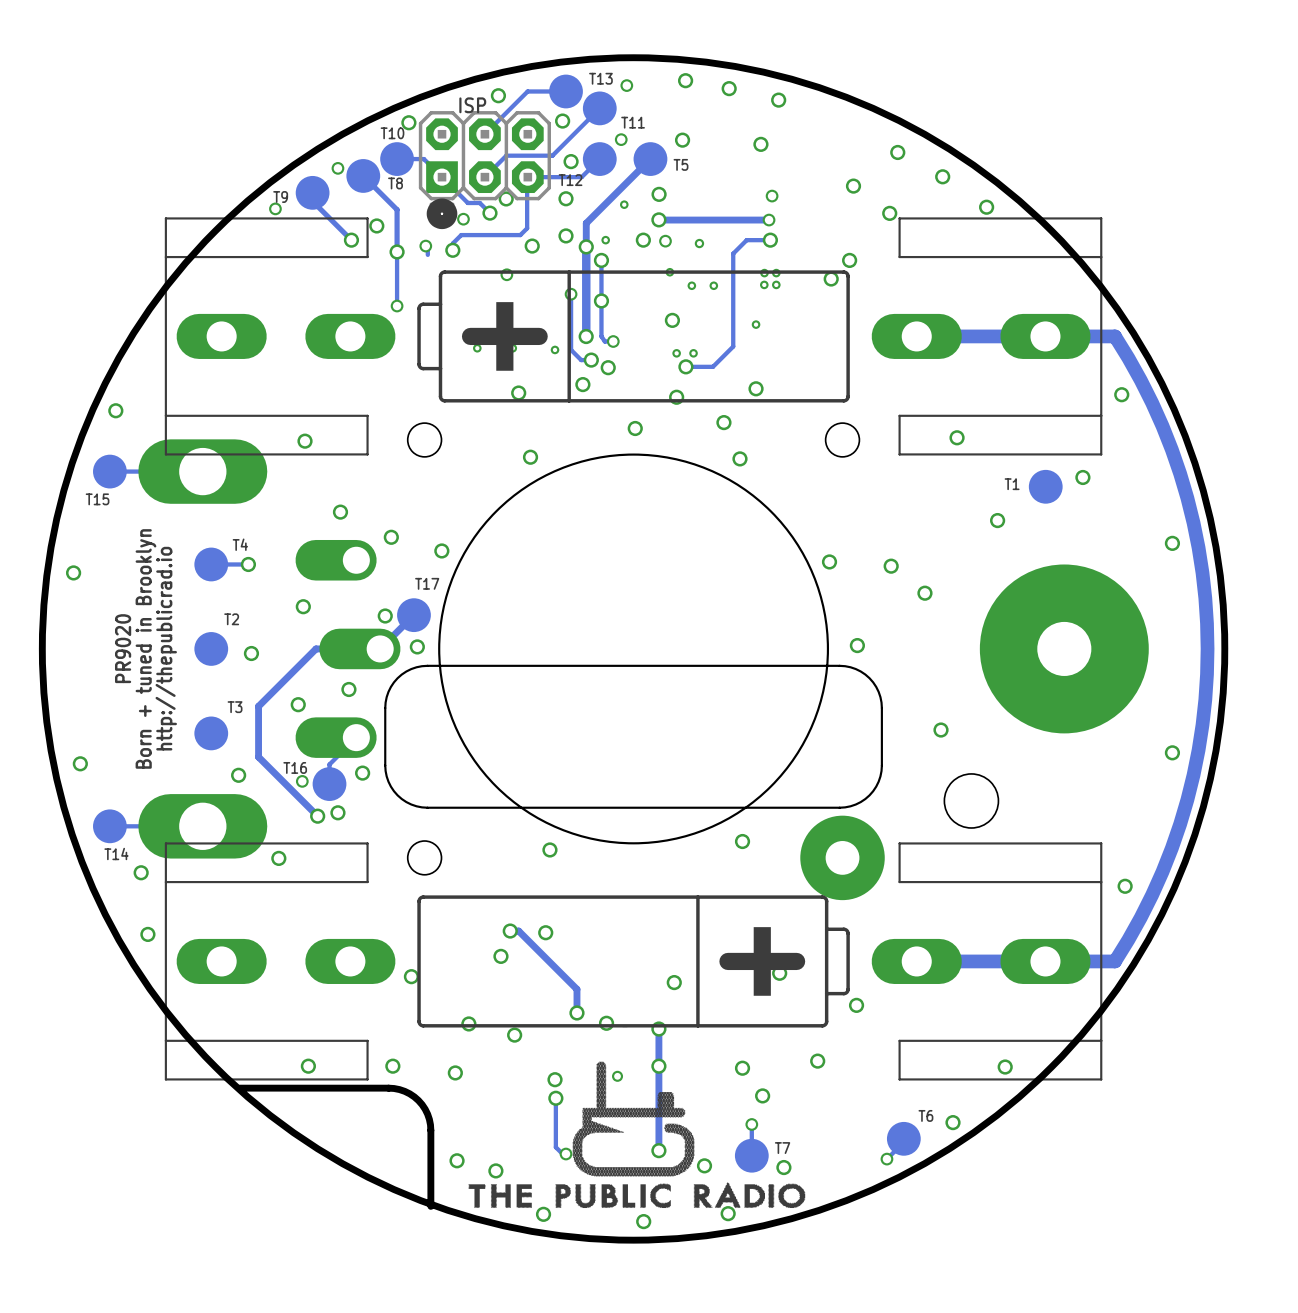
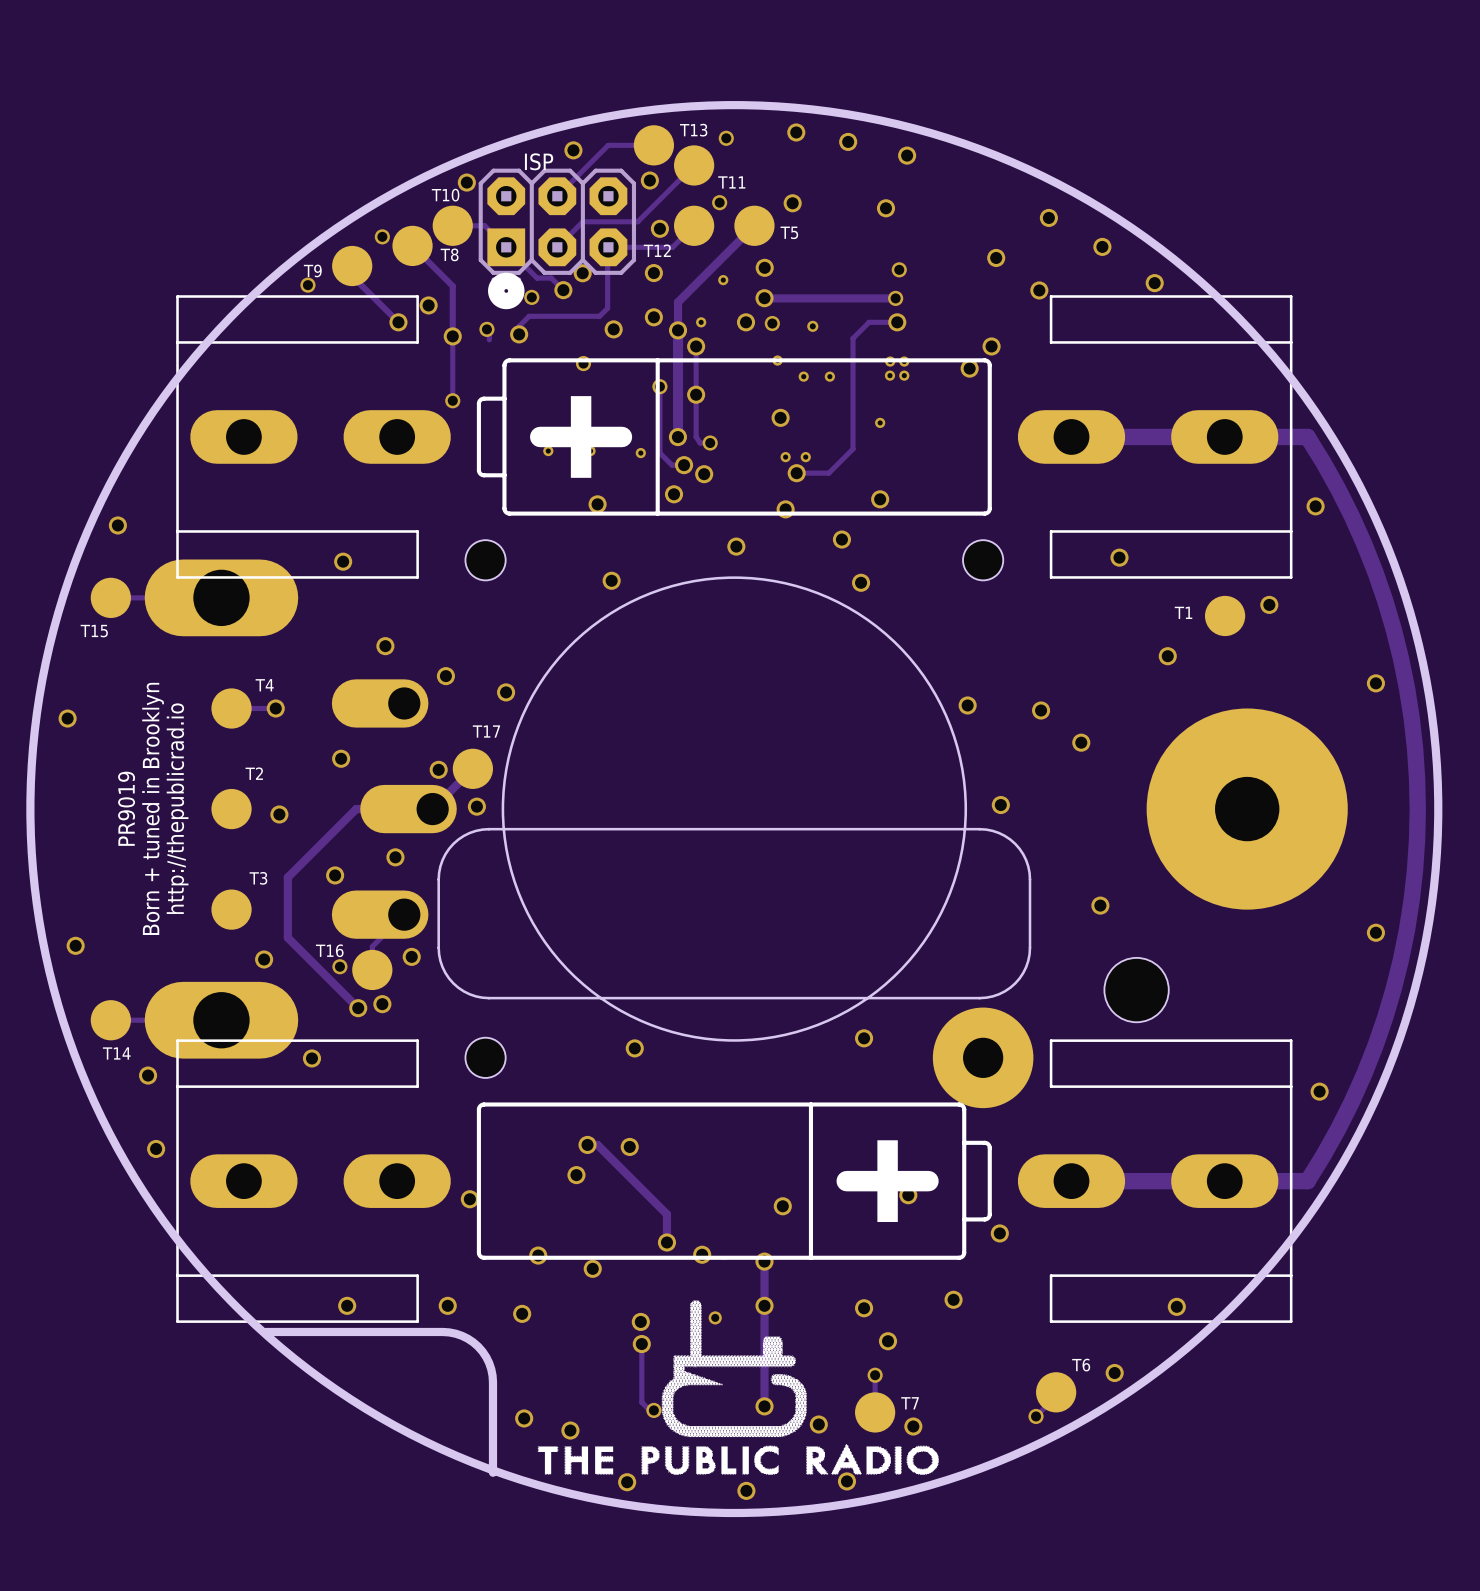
text: PR9020 (123, 648) -> PR9019 (126, 808)

